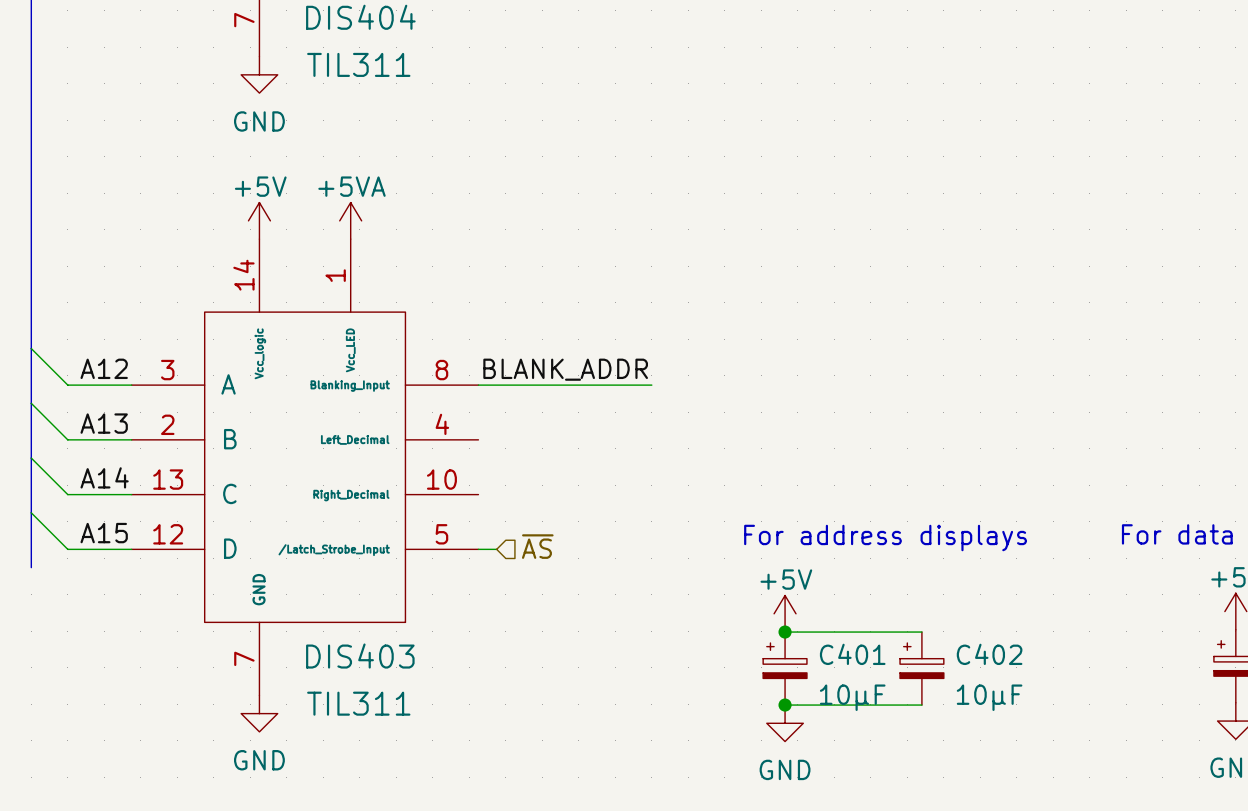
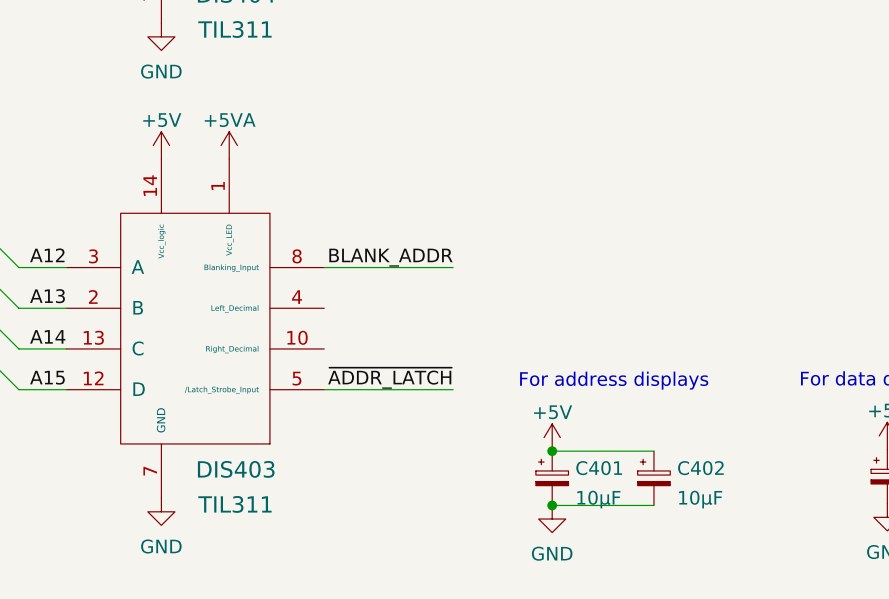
label: none -> ~{ADDR_LATCH} (389, 378)
hierarchical label: ~{AS} (537, 546) -> none
wire: none -> (337, 389) (453, 389)

